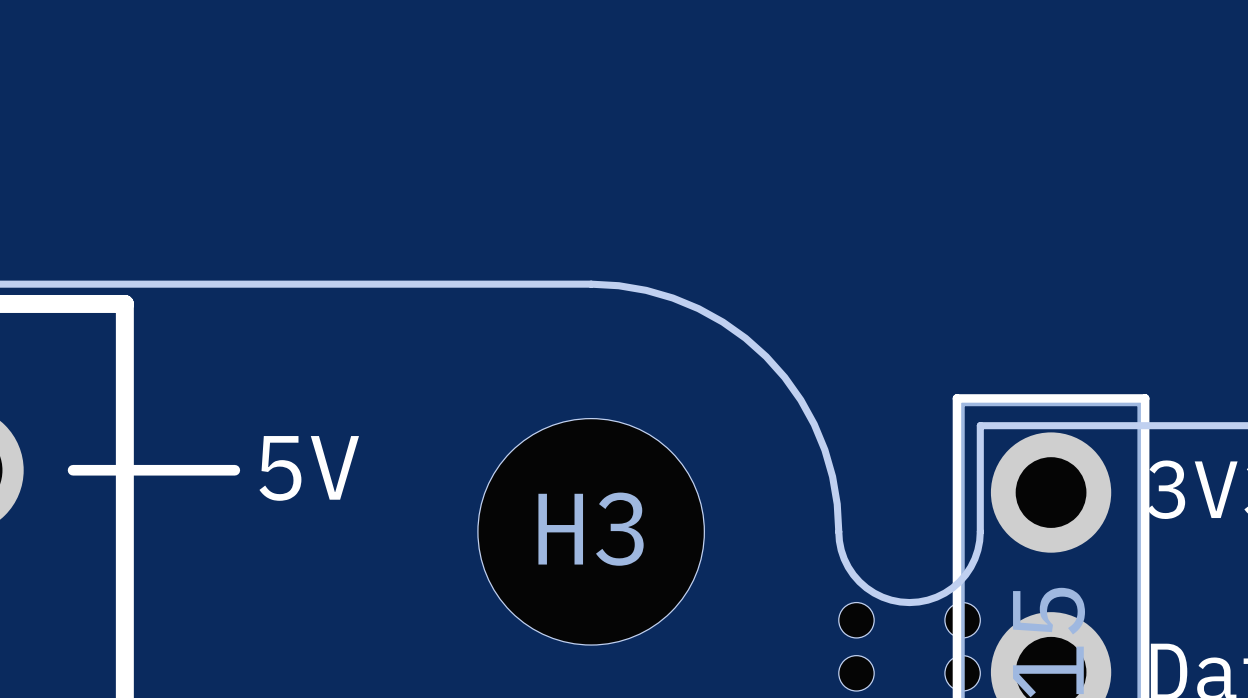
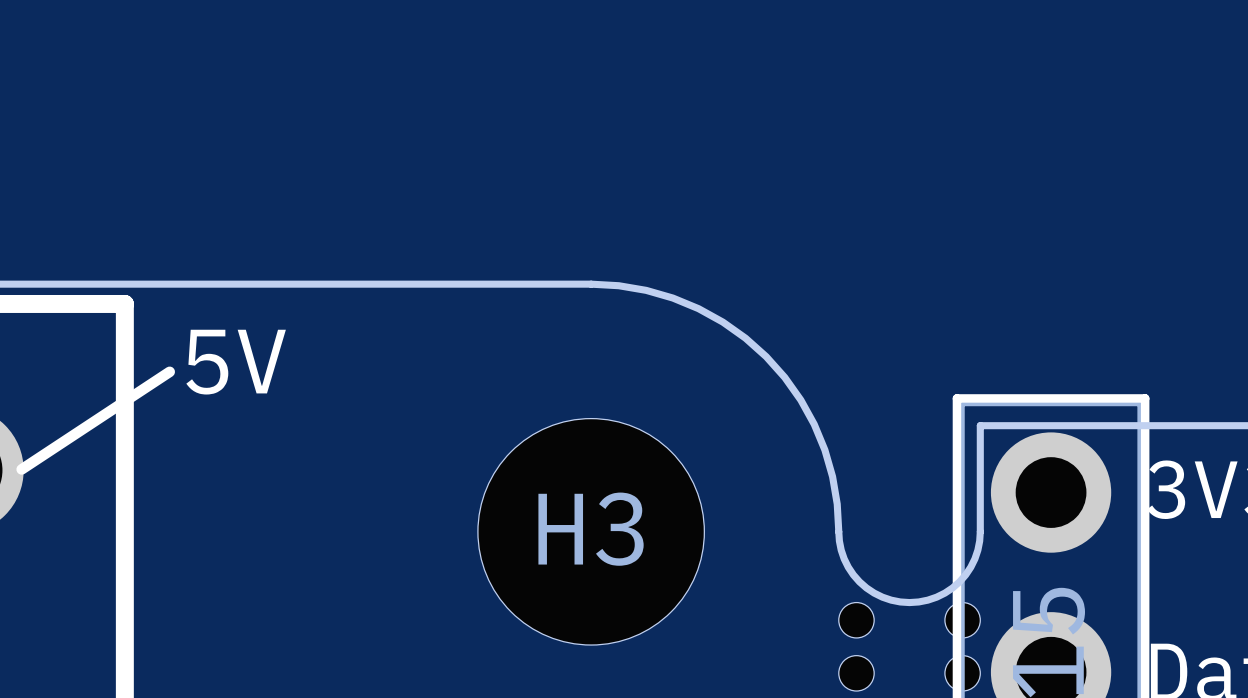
line: none -> (169, 371) (21, 469)
text position: 5V (309, 468) -> 5V (236, 362)
line: (73, 470) (234, 470) -> none

